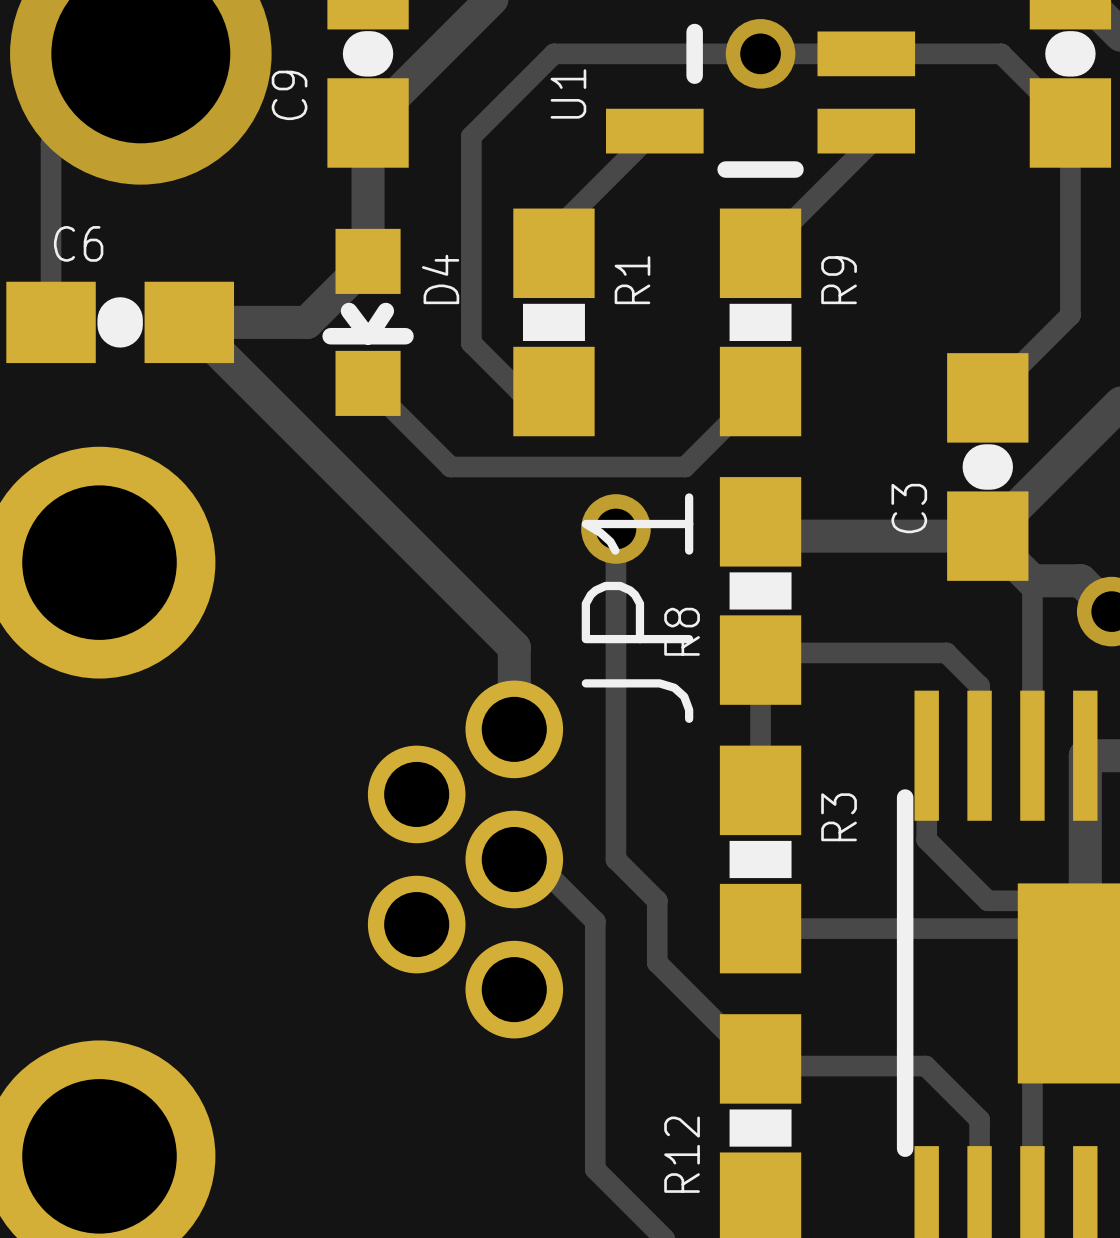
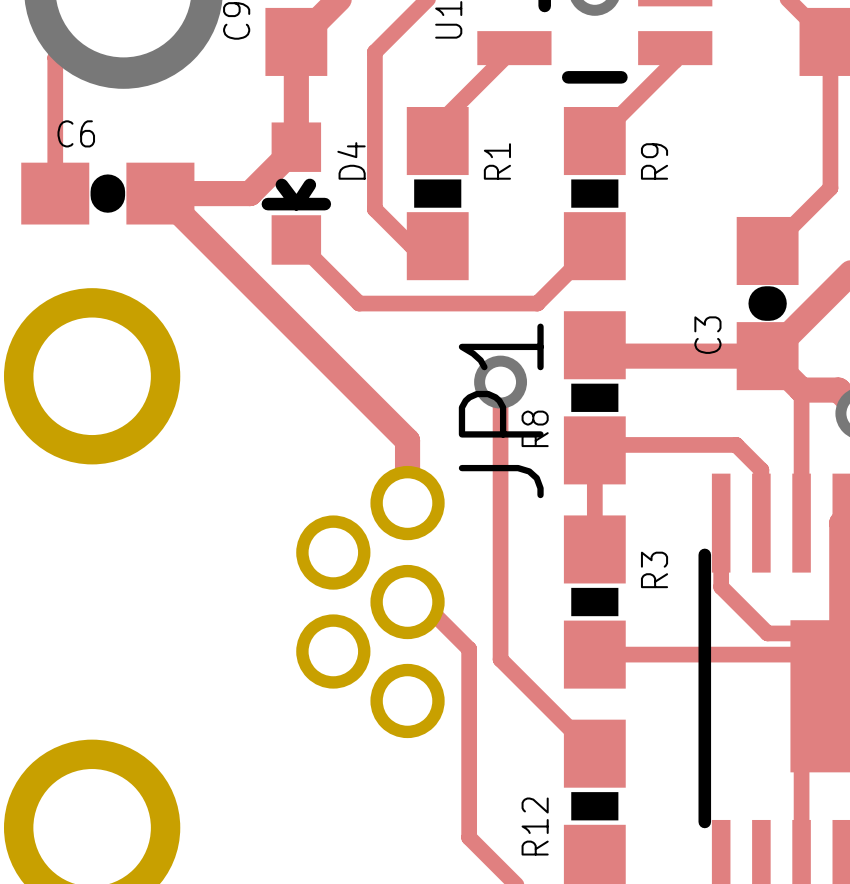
track: (615, 528) (615, 859) (657, 900) (657, 962) (753, 1058) (760, 1058) (767, 1066) (925, 1066) (979, 1119) (979, 1211) -> none
via position: (615, 528) -> (500, 382)
track: none -> (500, 382) (500, 659) (594, 753)

